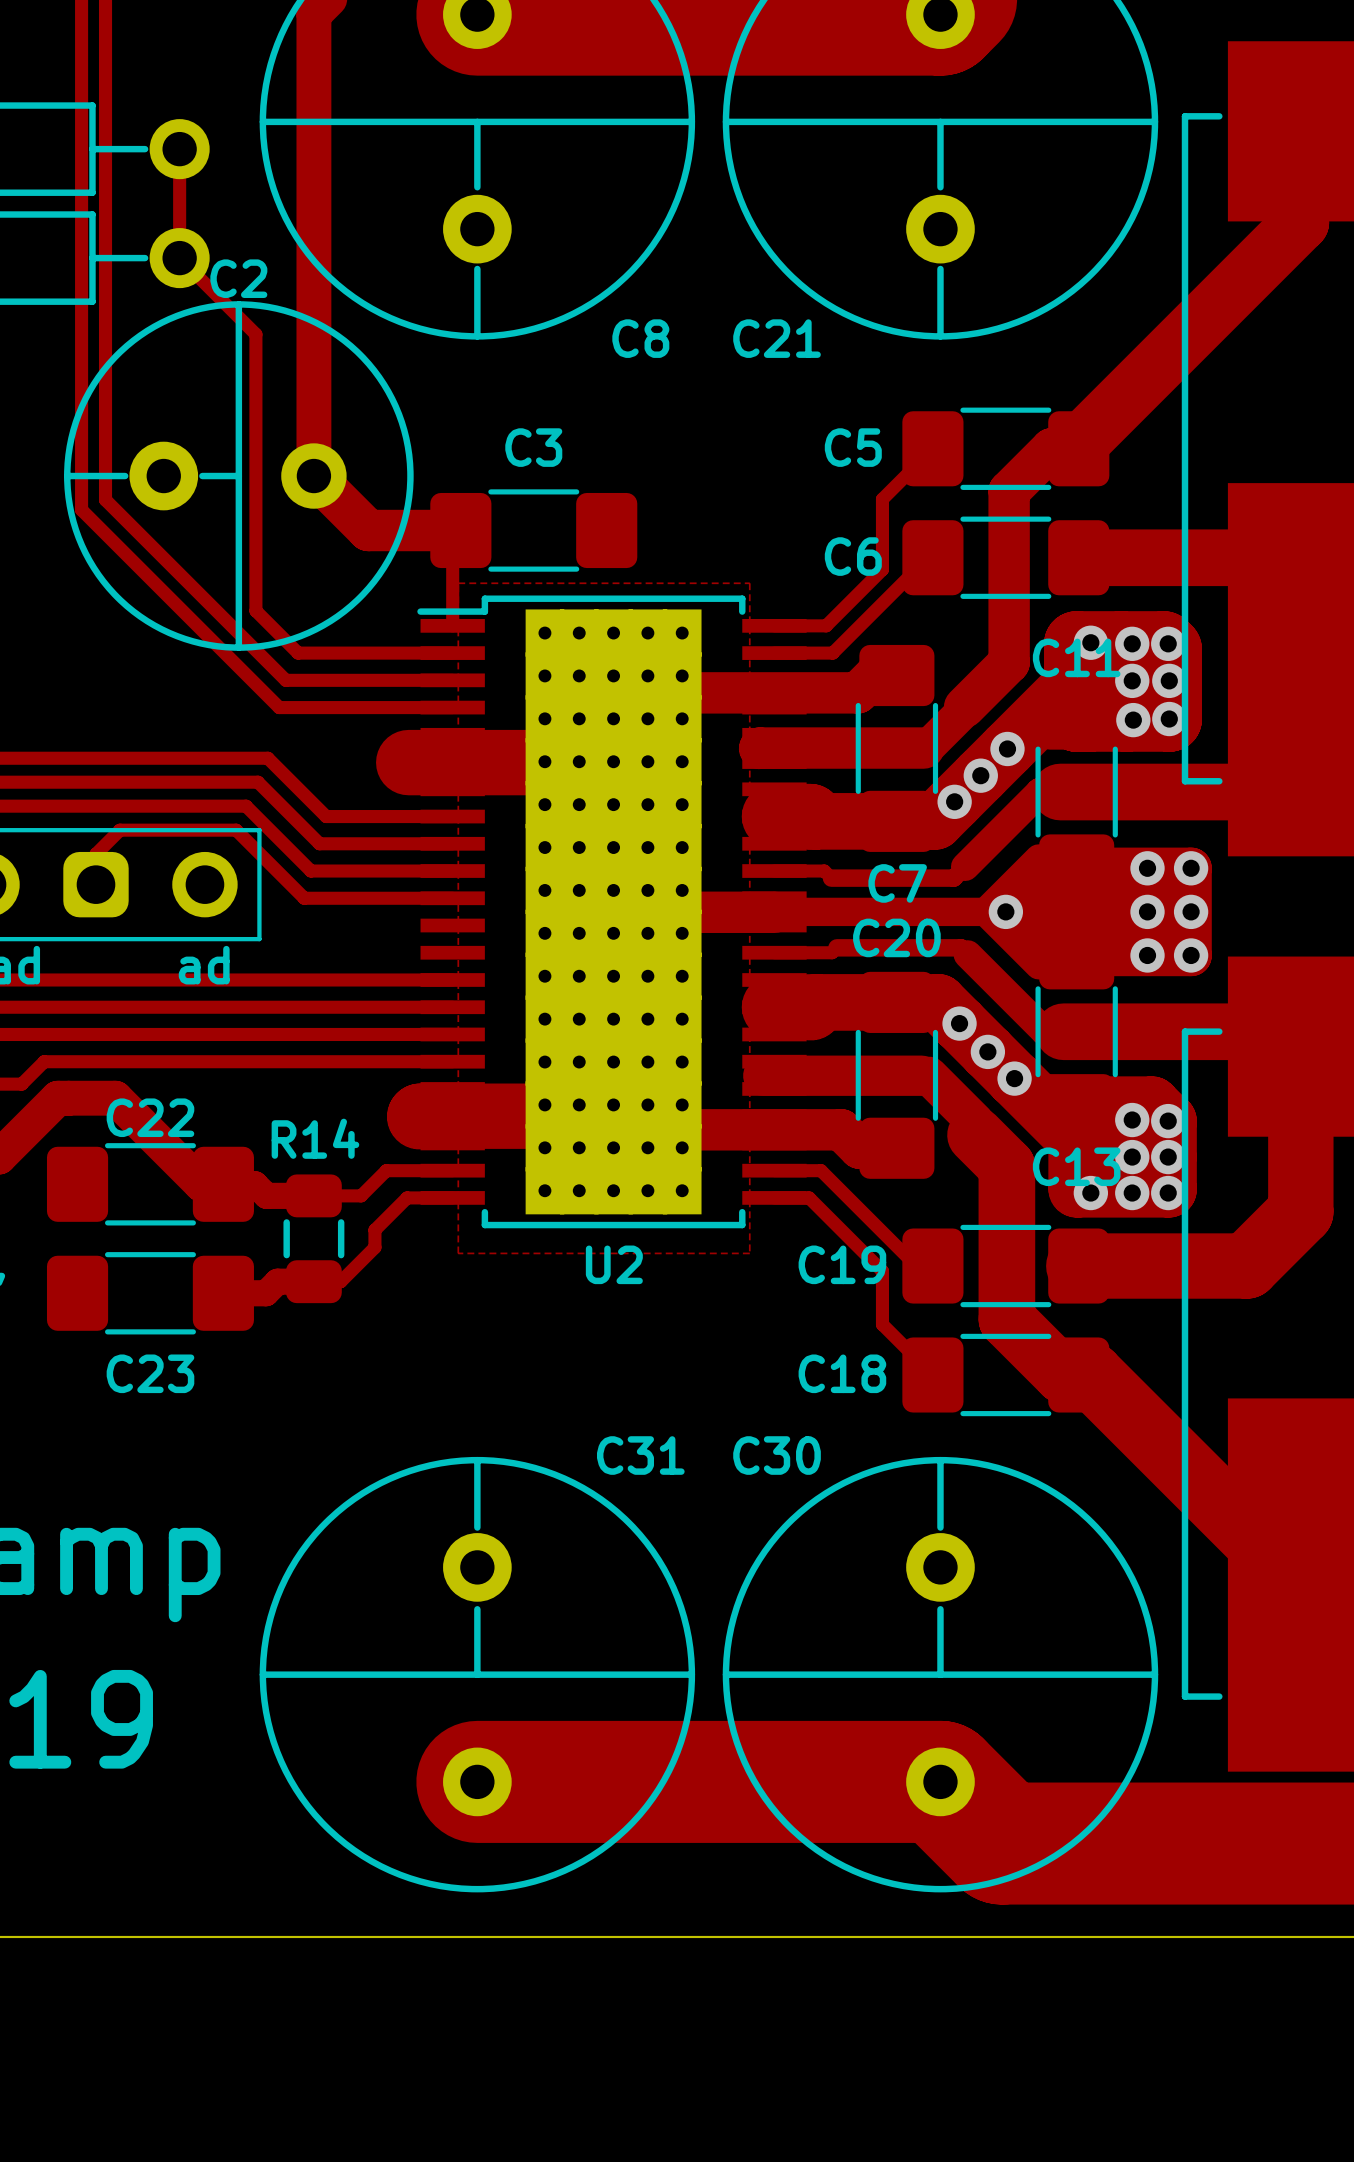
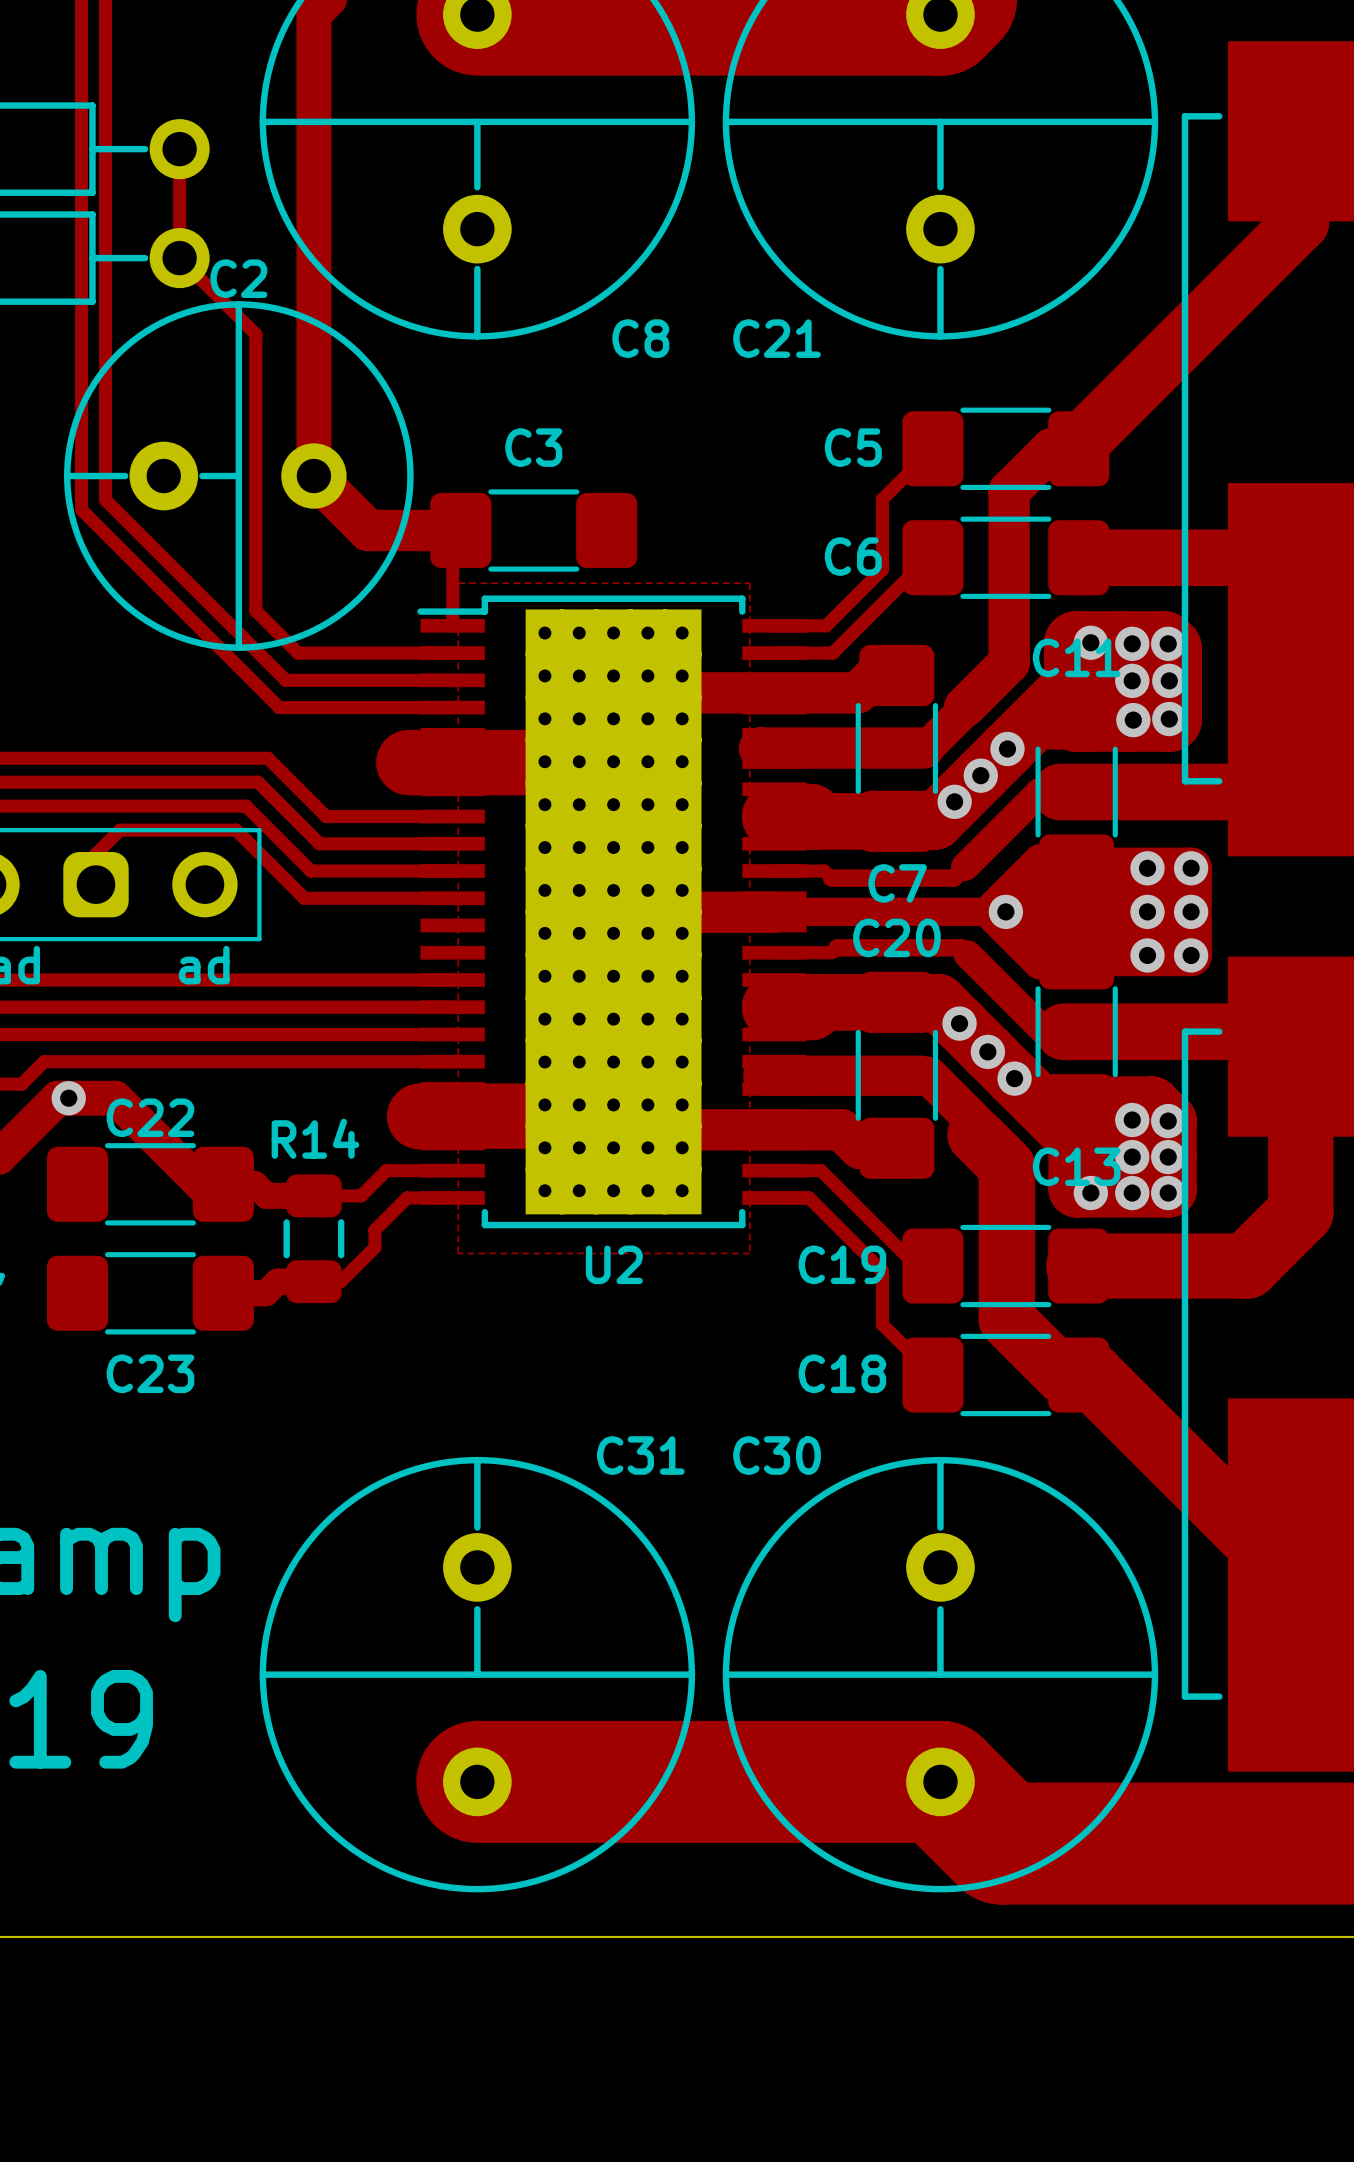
via: none -> (68, 1098)

